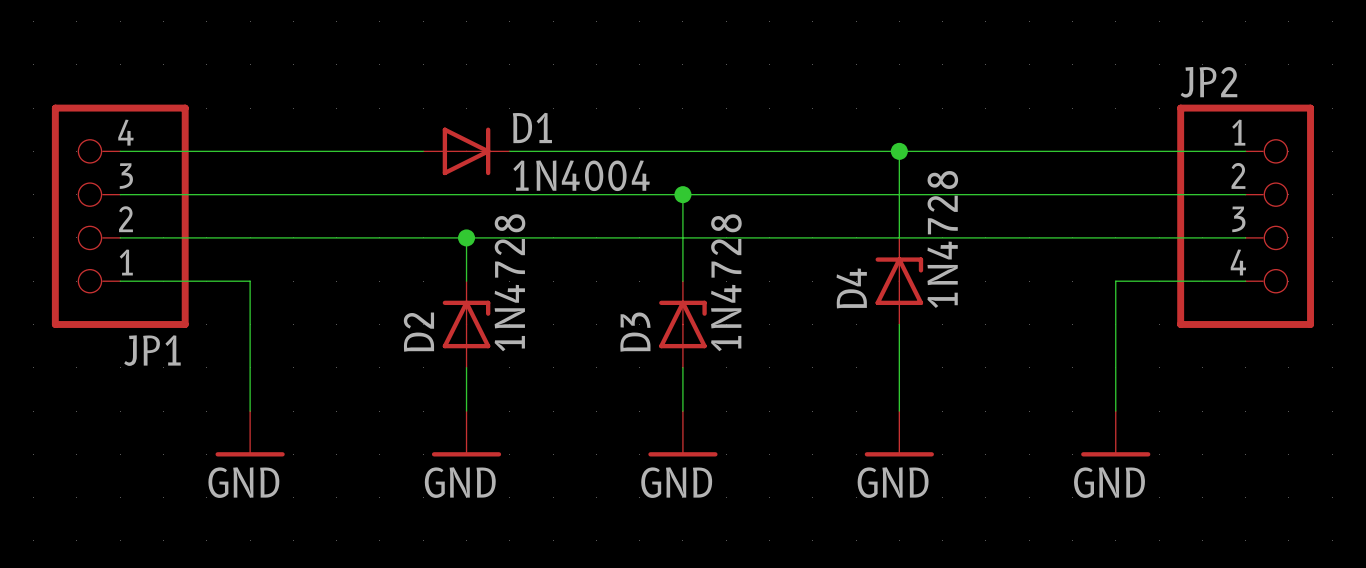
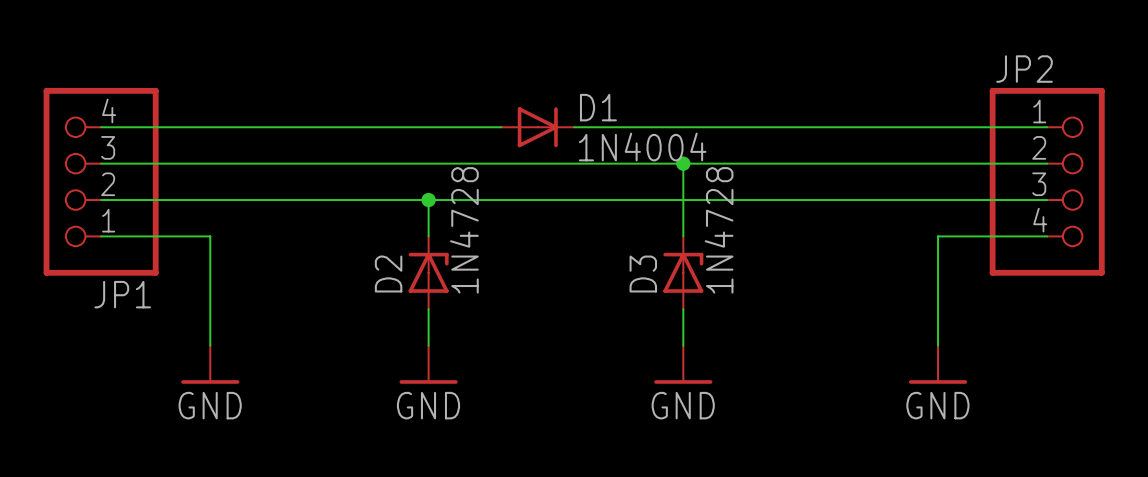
D1 position: (466, 151) -> (537, 127)
wire: (899, 151) (899, 237) -> none
junction: (899, 151) -> none
wire: (682, 194) (682, 281) -> (683, 163) (683, 236)
junction: (682, 194) -> none
junction: none -> (683, 163)
wire: (466, 237) (466, 281) -> (428, 200) (428, 236)
junction position: (466, 237) -> (428, 200)
D4: 1N4728 (899, 281) -> none
D2 position: (466, 324) -> (428, 272)
D3 position: (682, 324) -> (683, 272)
wire: (899, 324) (899, 411) -> none
wire: (466, 367) (466, 411) -> (428, 309) (428, 345)
wire: (682, 367) (682, 411) -> (683, 309) (683, 345)
power symbol position: GND (466, 433) -> GND (428, 364)
power symbol: GND (682, 433) -> none
power symbol: none -> GND (683, 364)
power symbol: GND (899, 433) -> none

